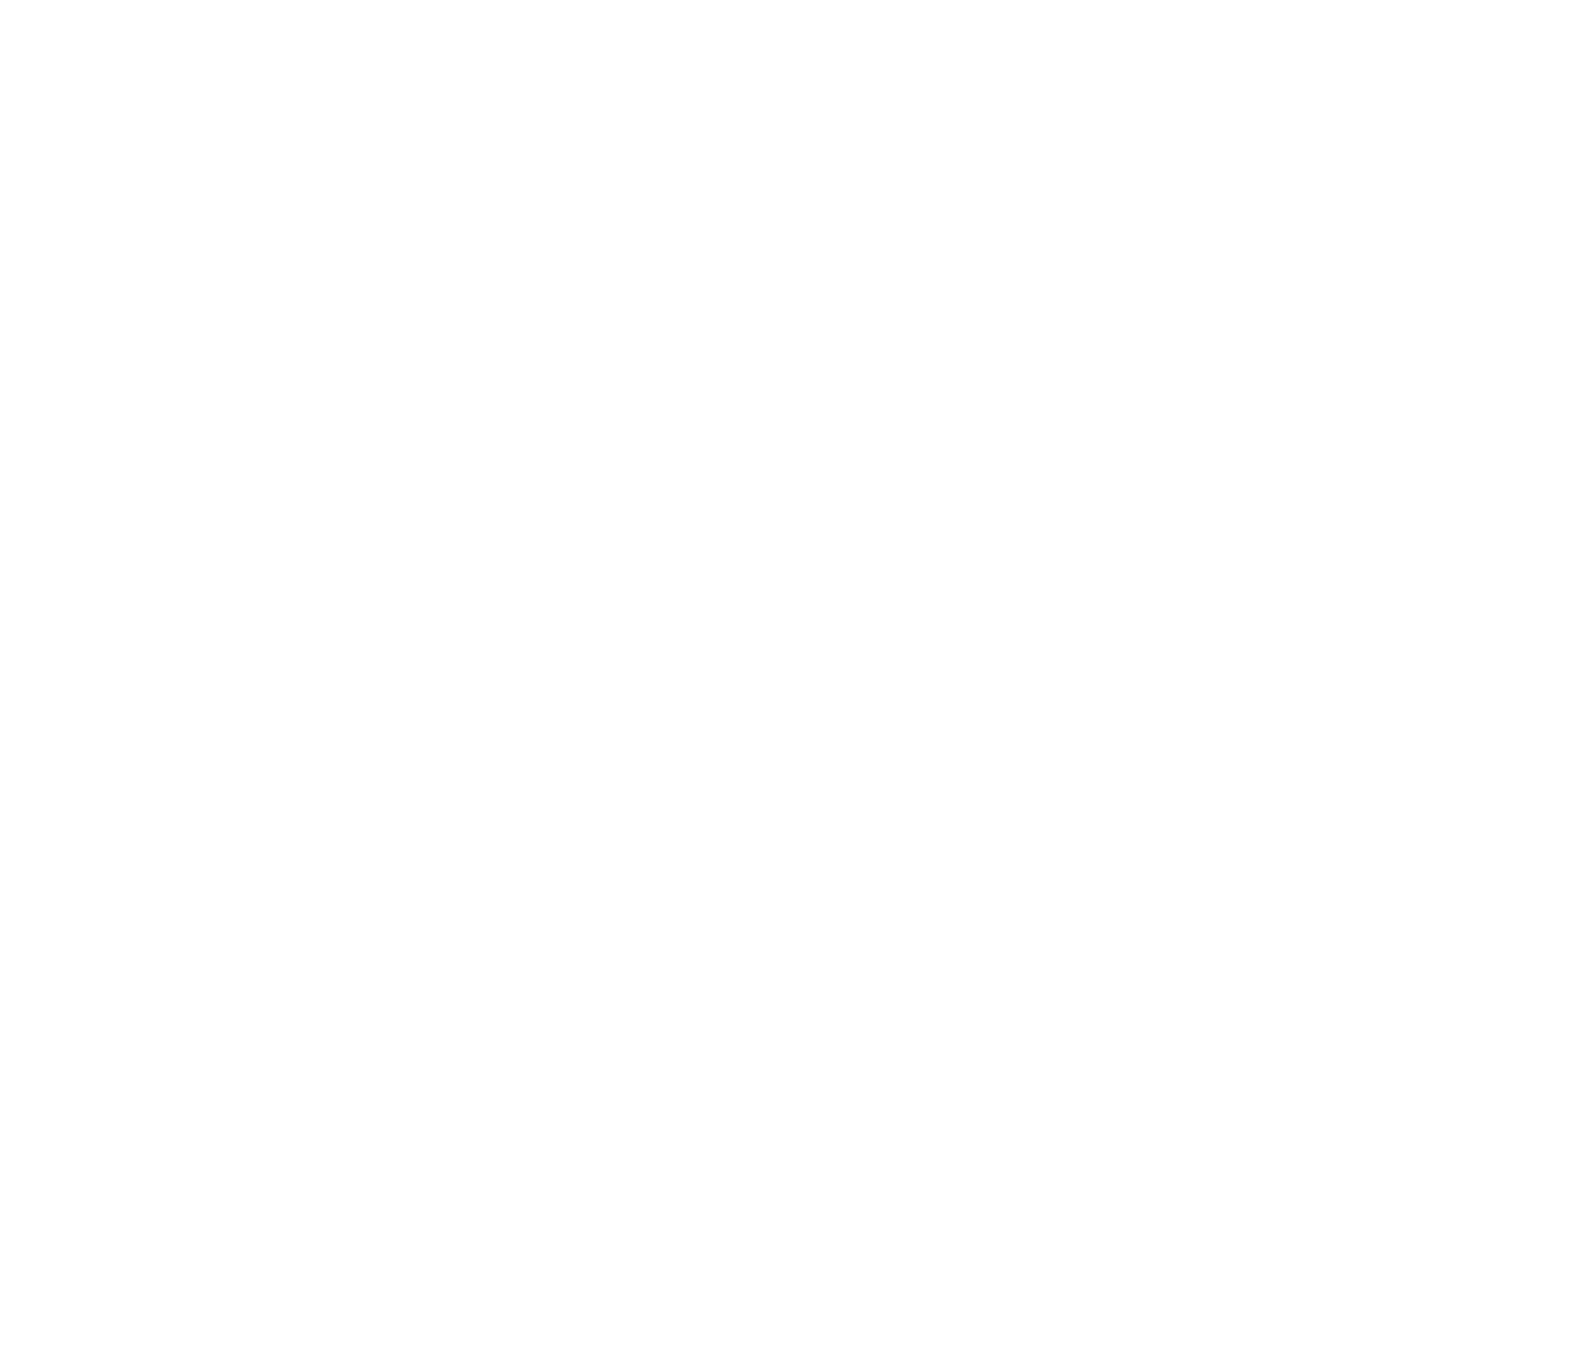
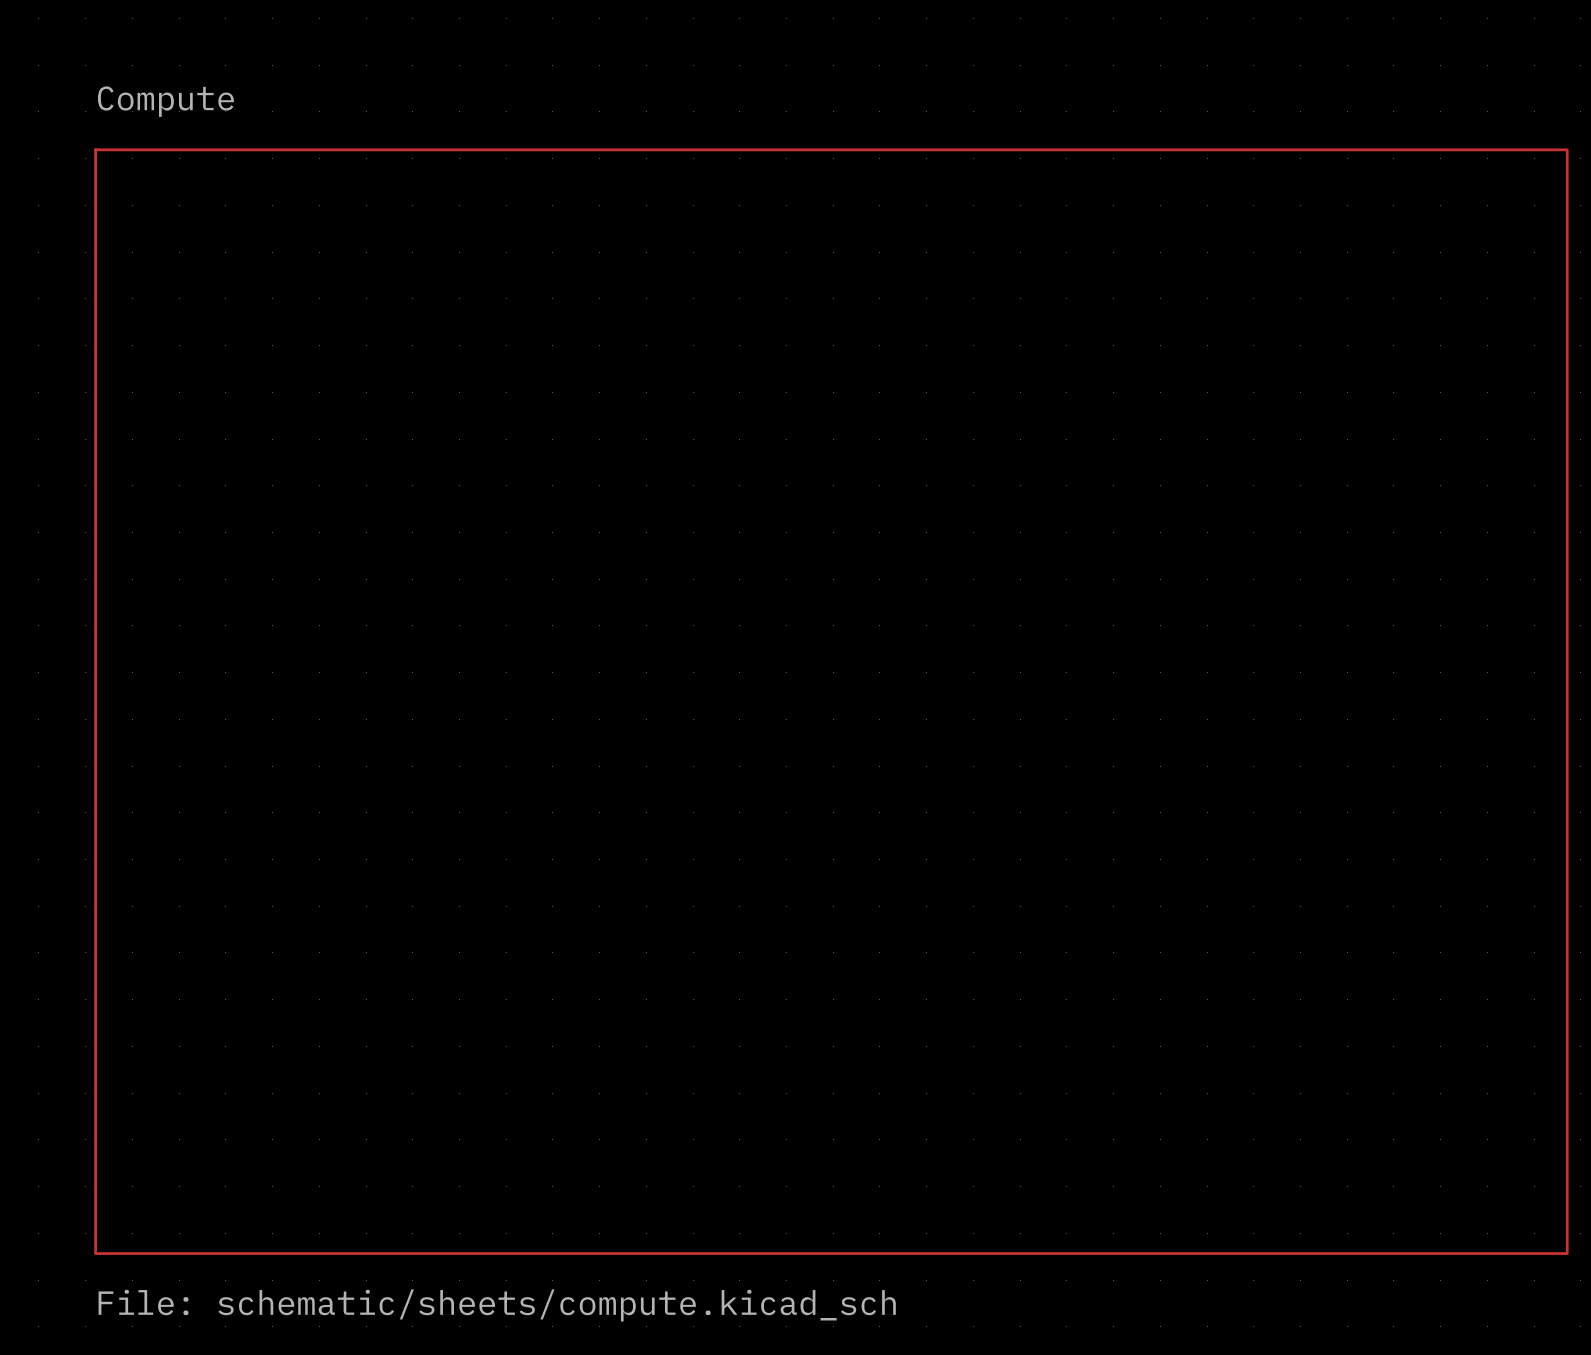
sheet Compute: none -> File: schematic/sheets/compute.kicad_sch (831, 701)

